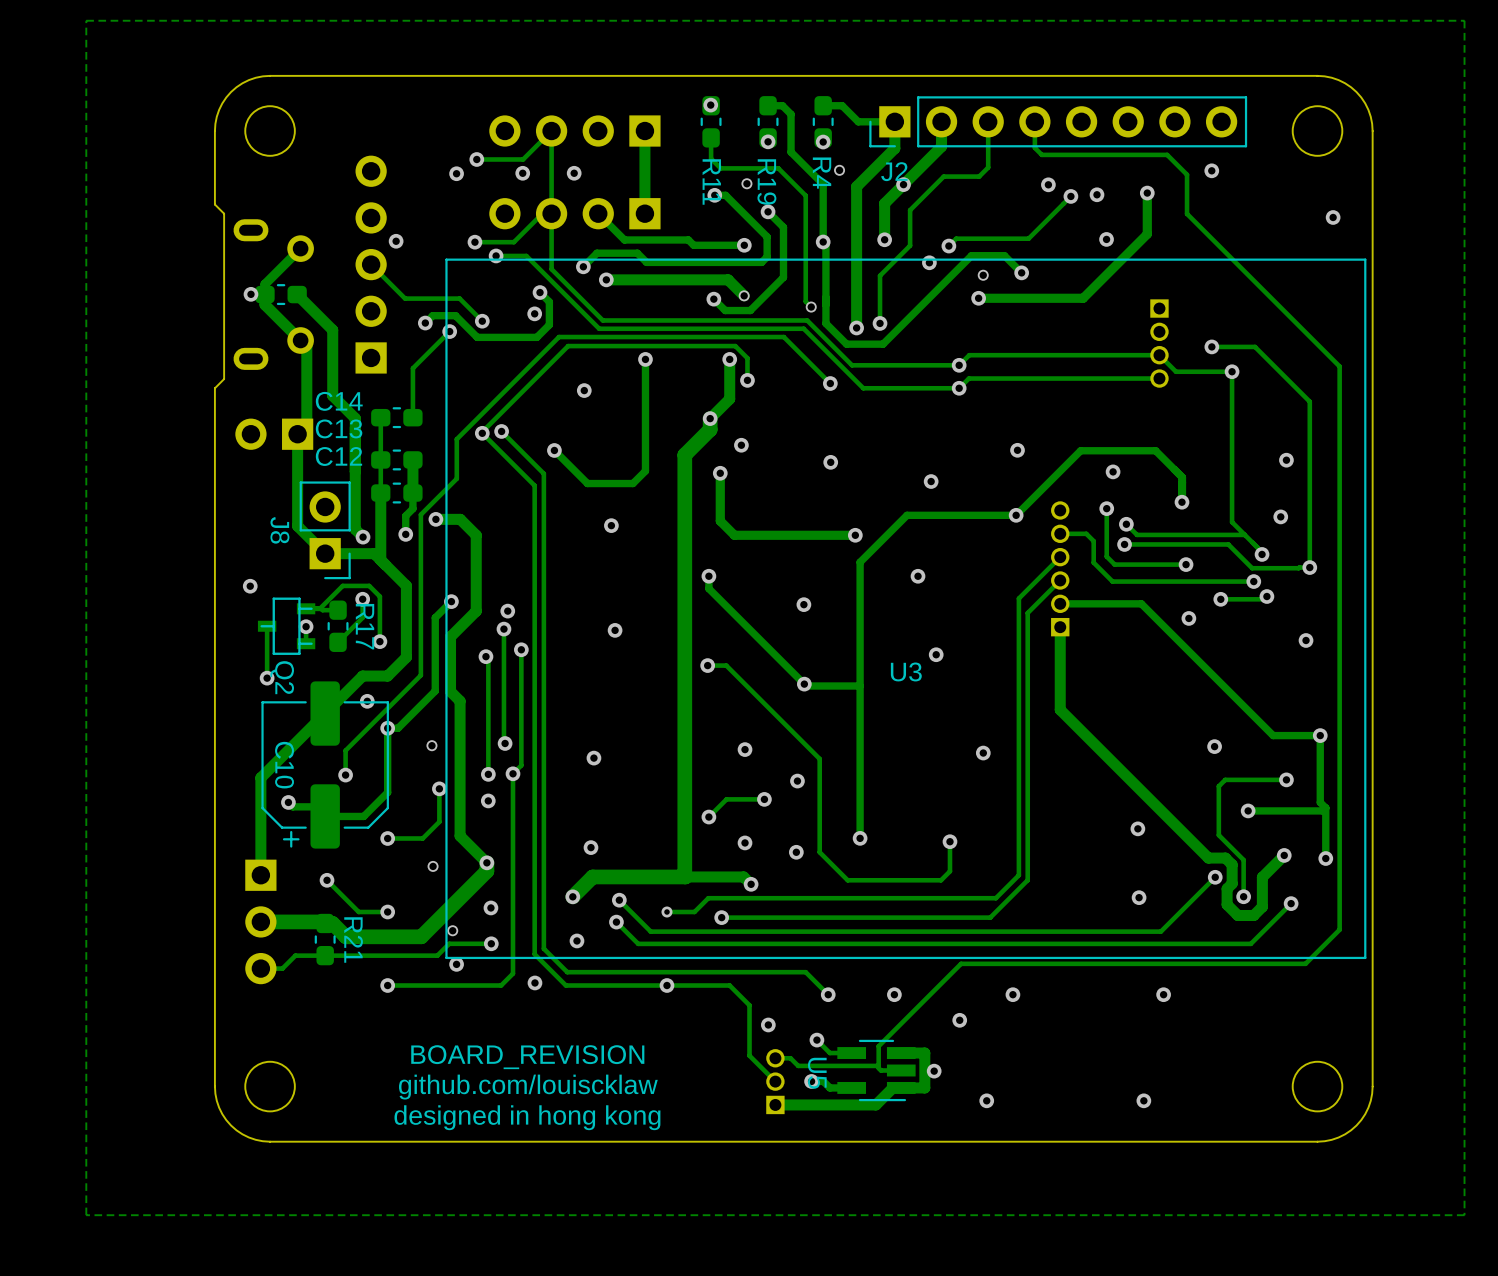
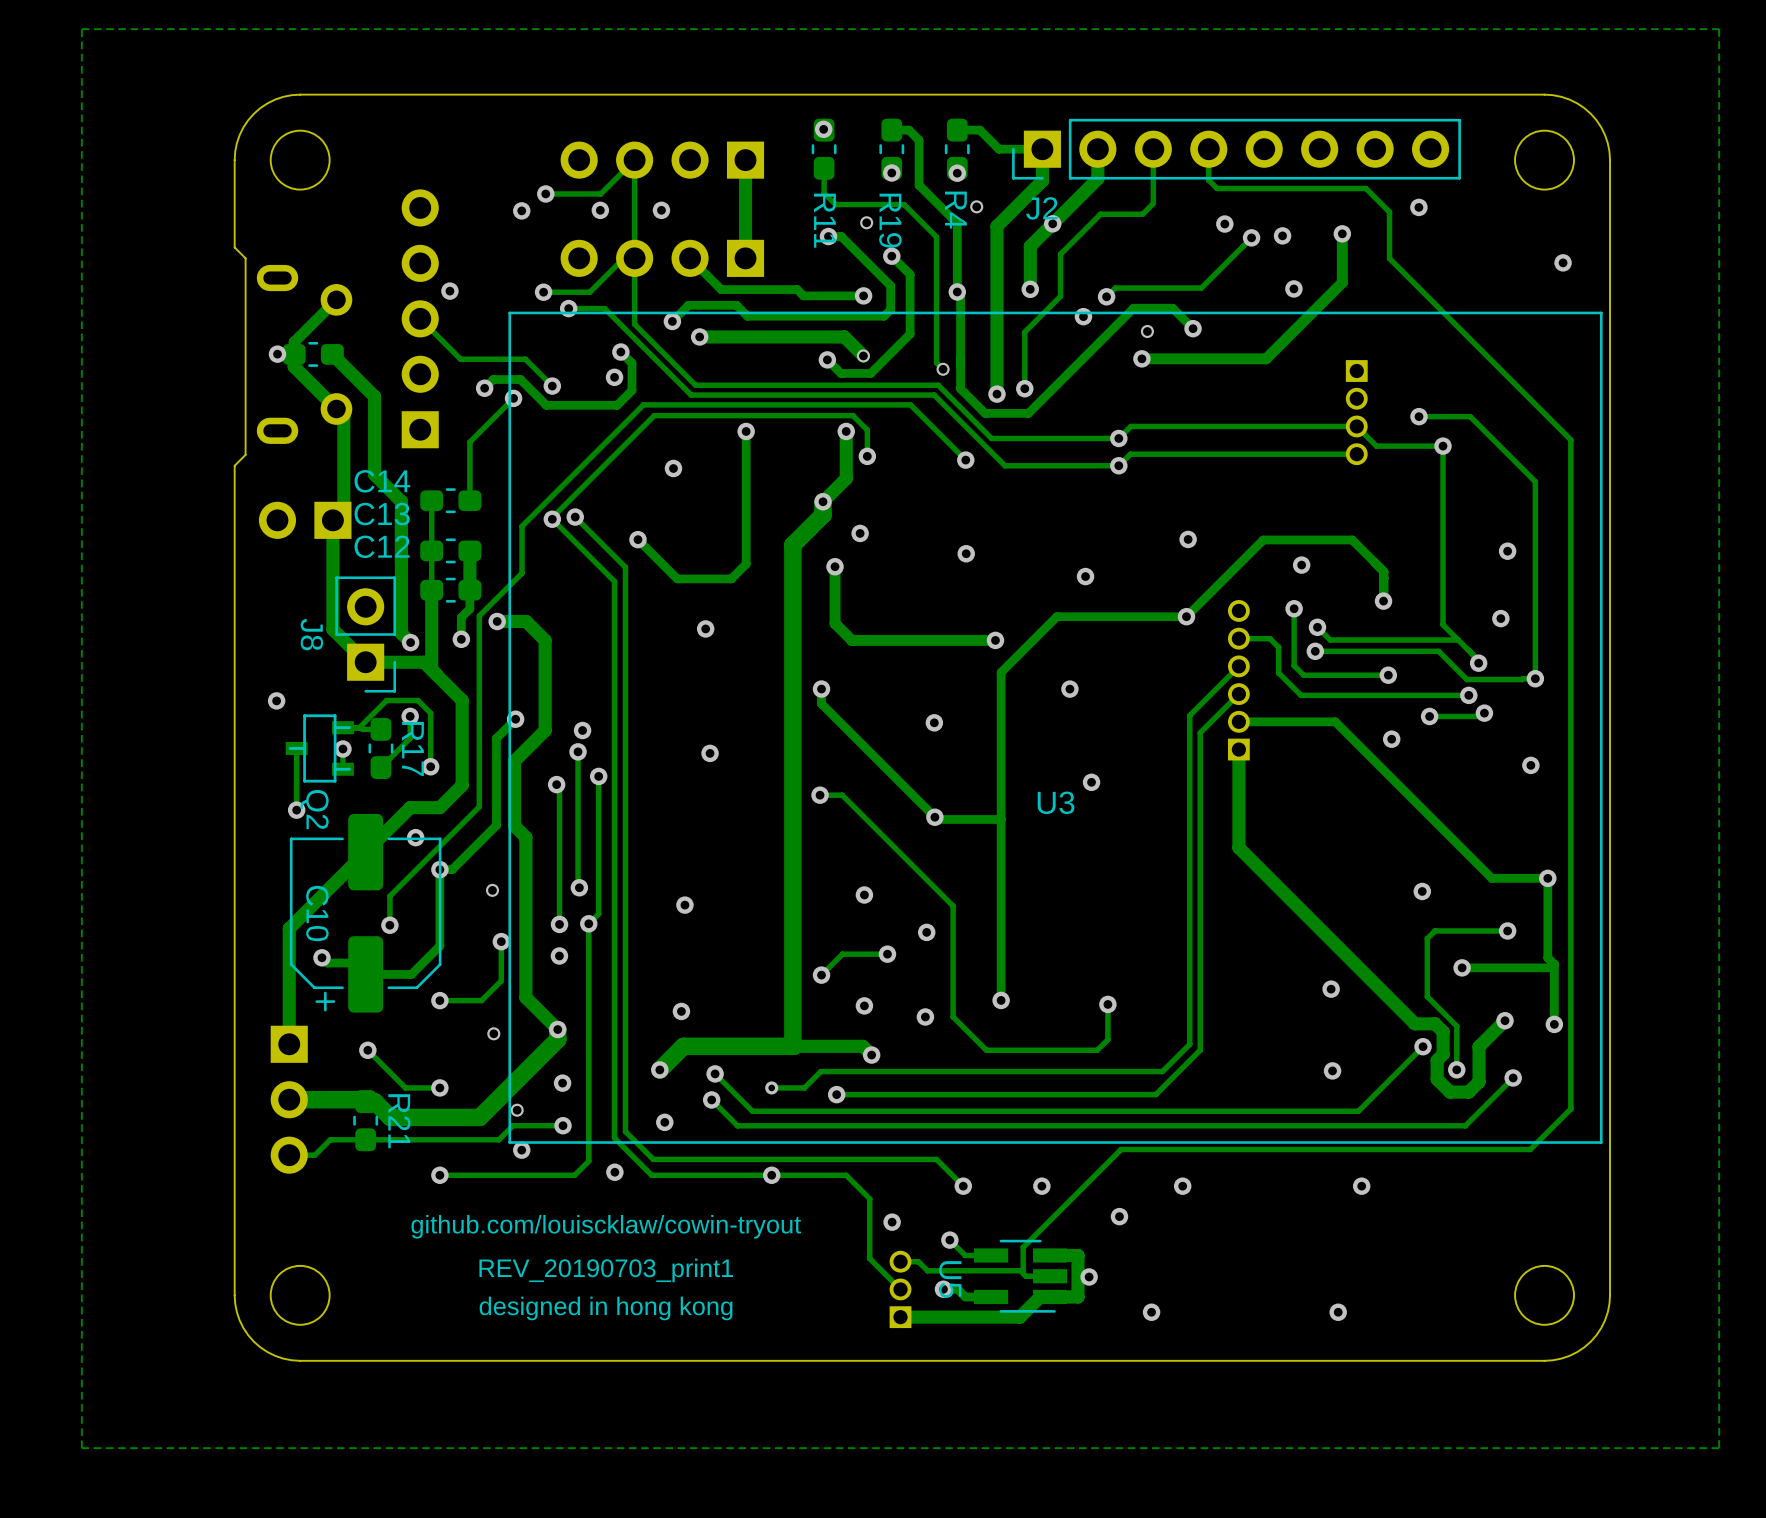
via: (983, 753) -> none
drawing: none -> [411, 1214, 802, 1239]
drawing shape: [411, 1045, 645, 1070] -> [479, 1258, 734, 1283]
drawing: [394, 1074, 661, 1131] -> none
drawing: none -> [479, 1296, 733, 1321]

